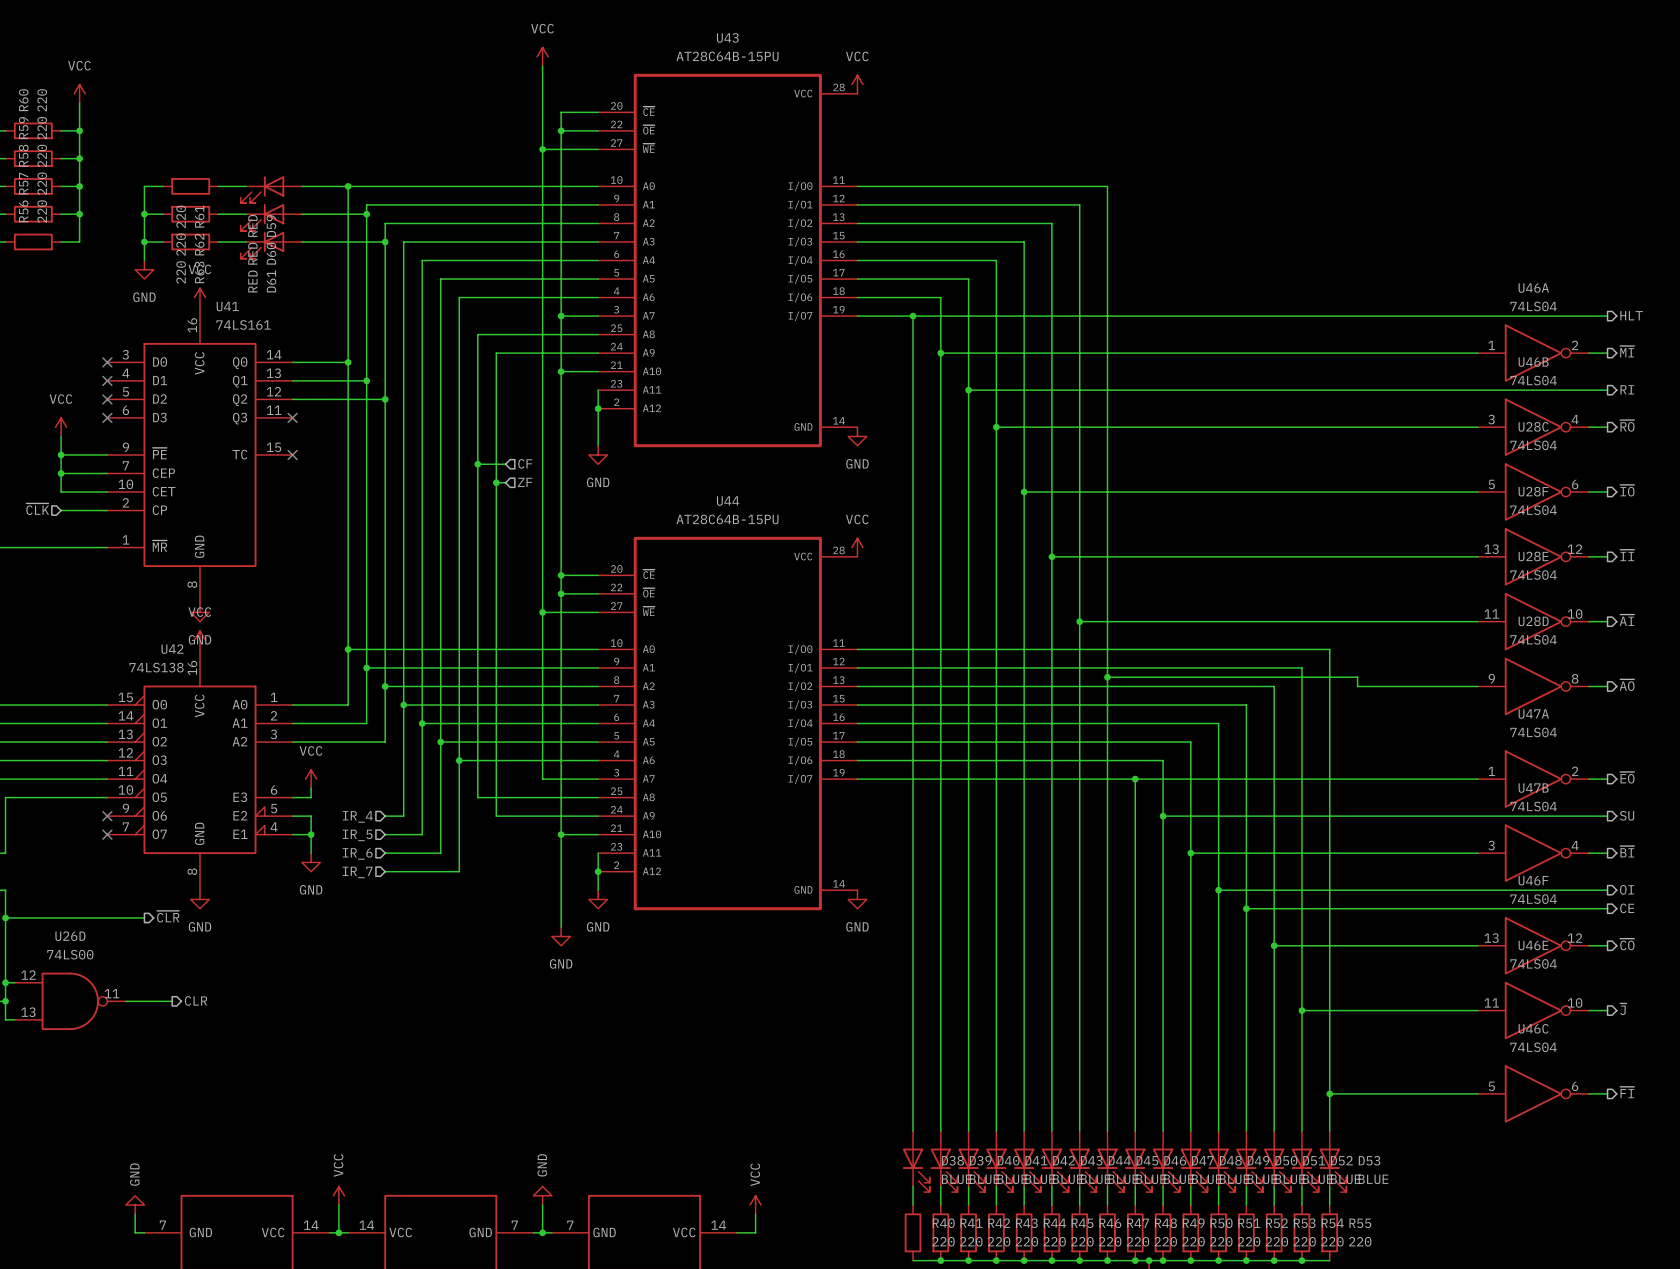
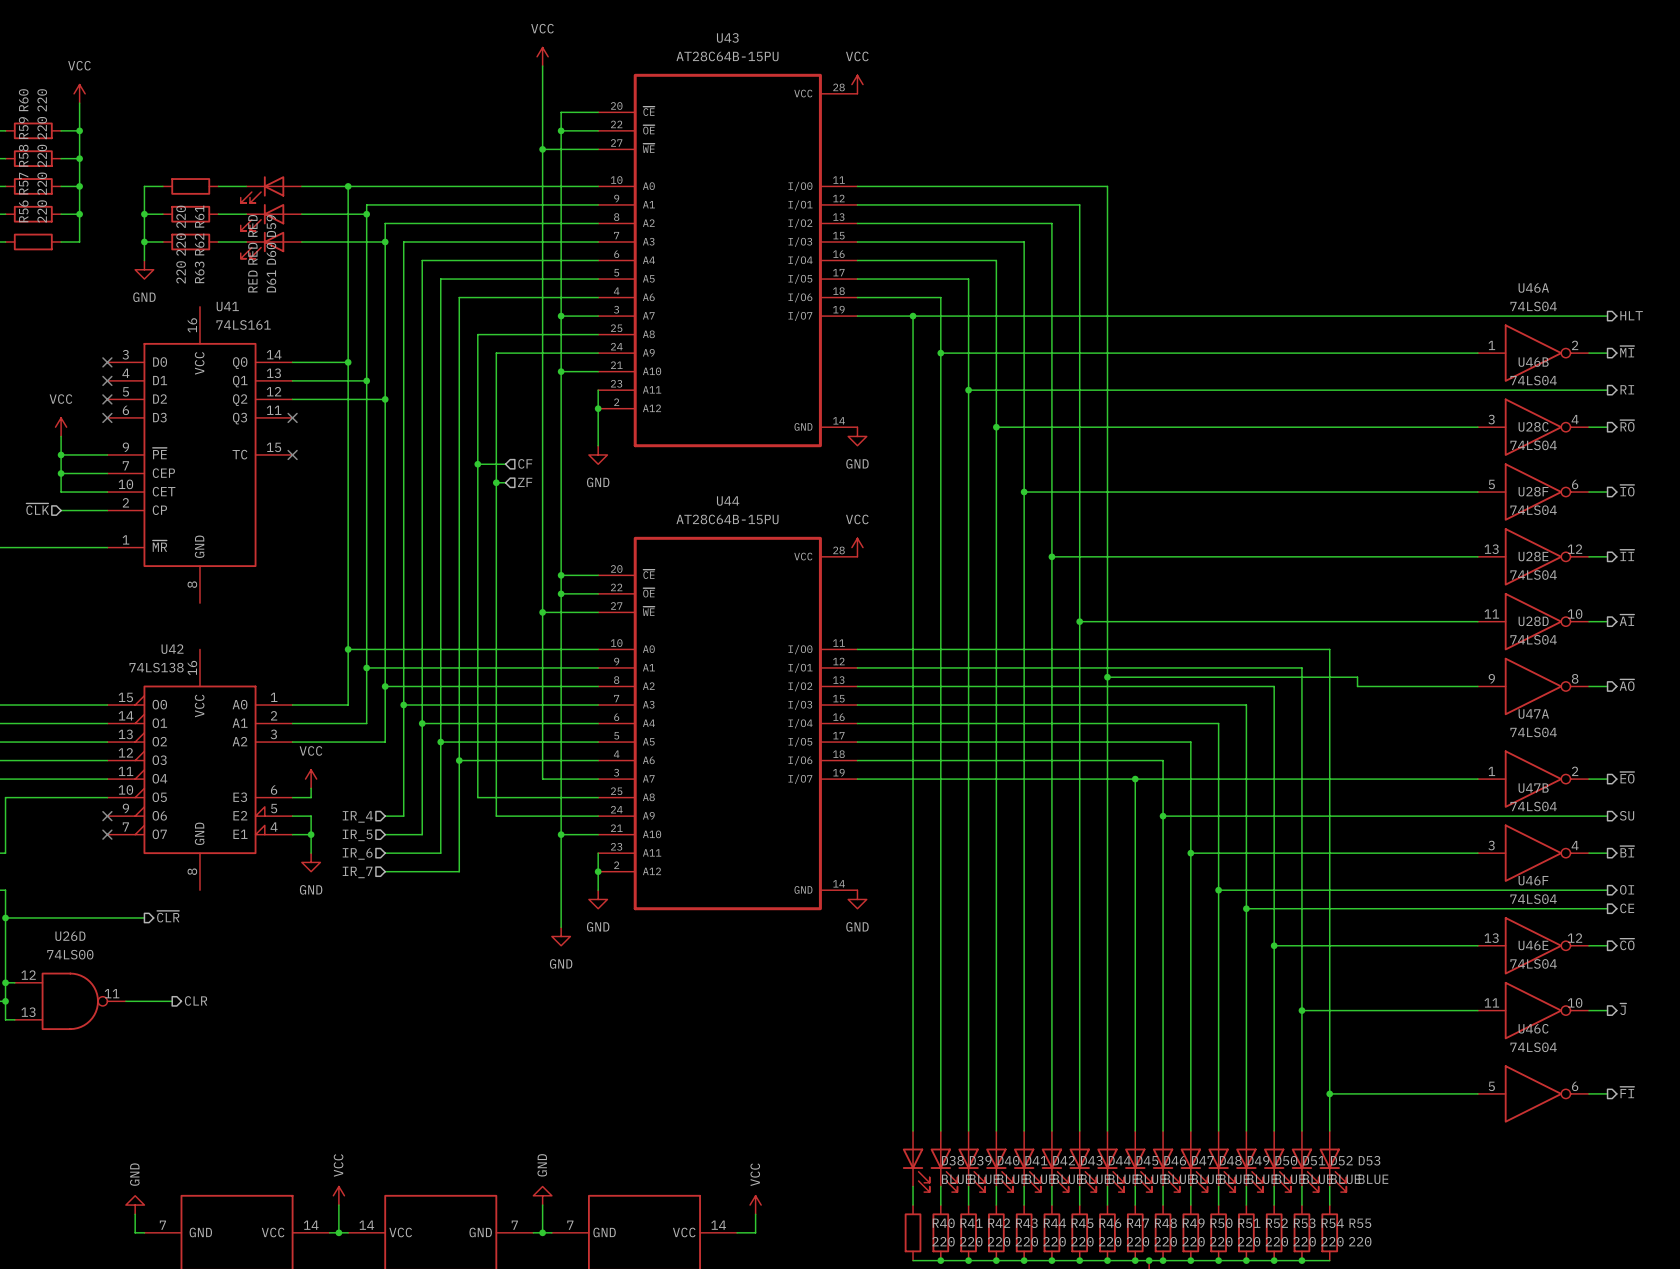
power symbol: VCC (199, 297) -> none
power symbol: GND (199, 612) -> none
power symbol: VCC (199, 640) -> none
power symbol: GND (199, 899) -> none

